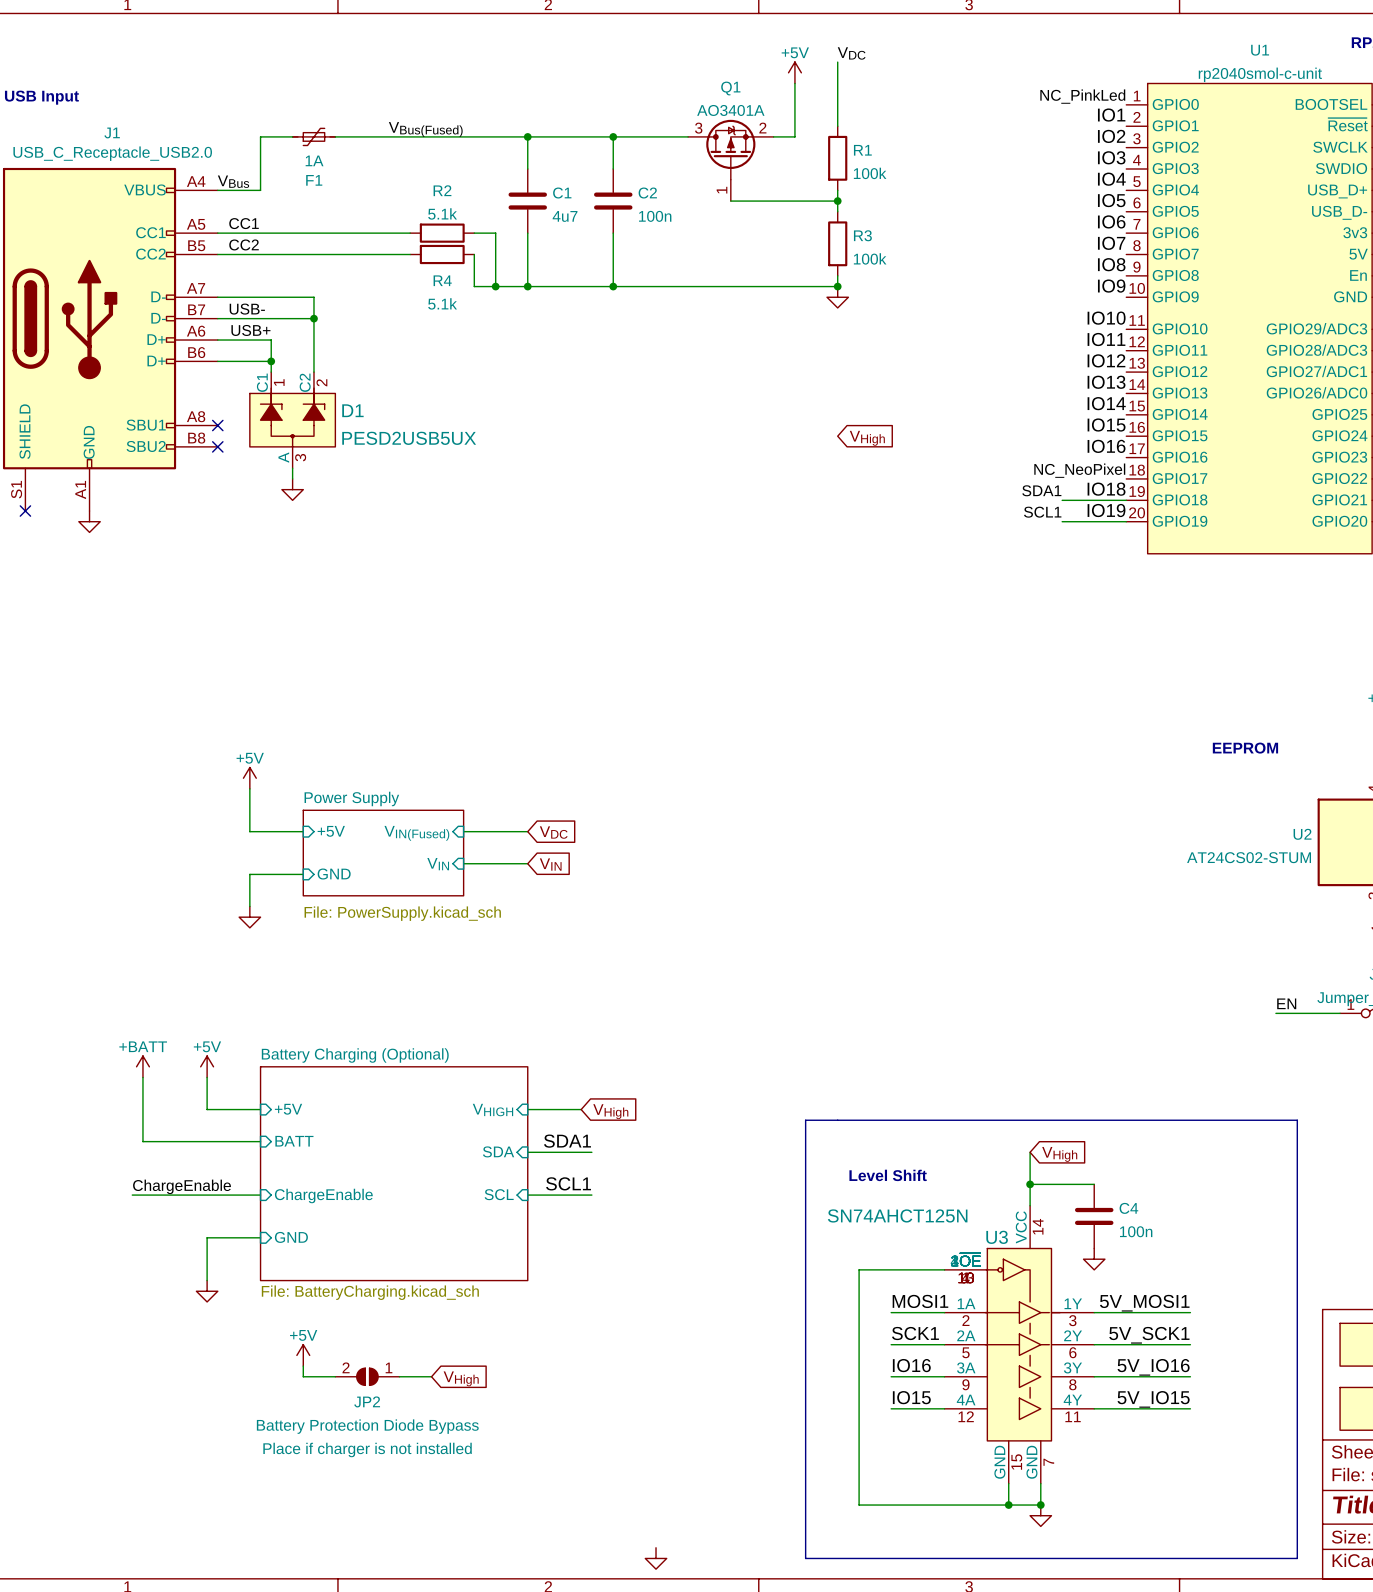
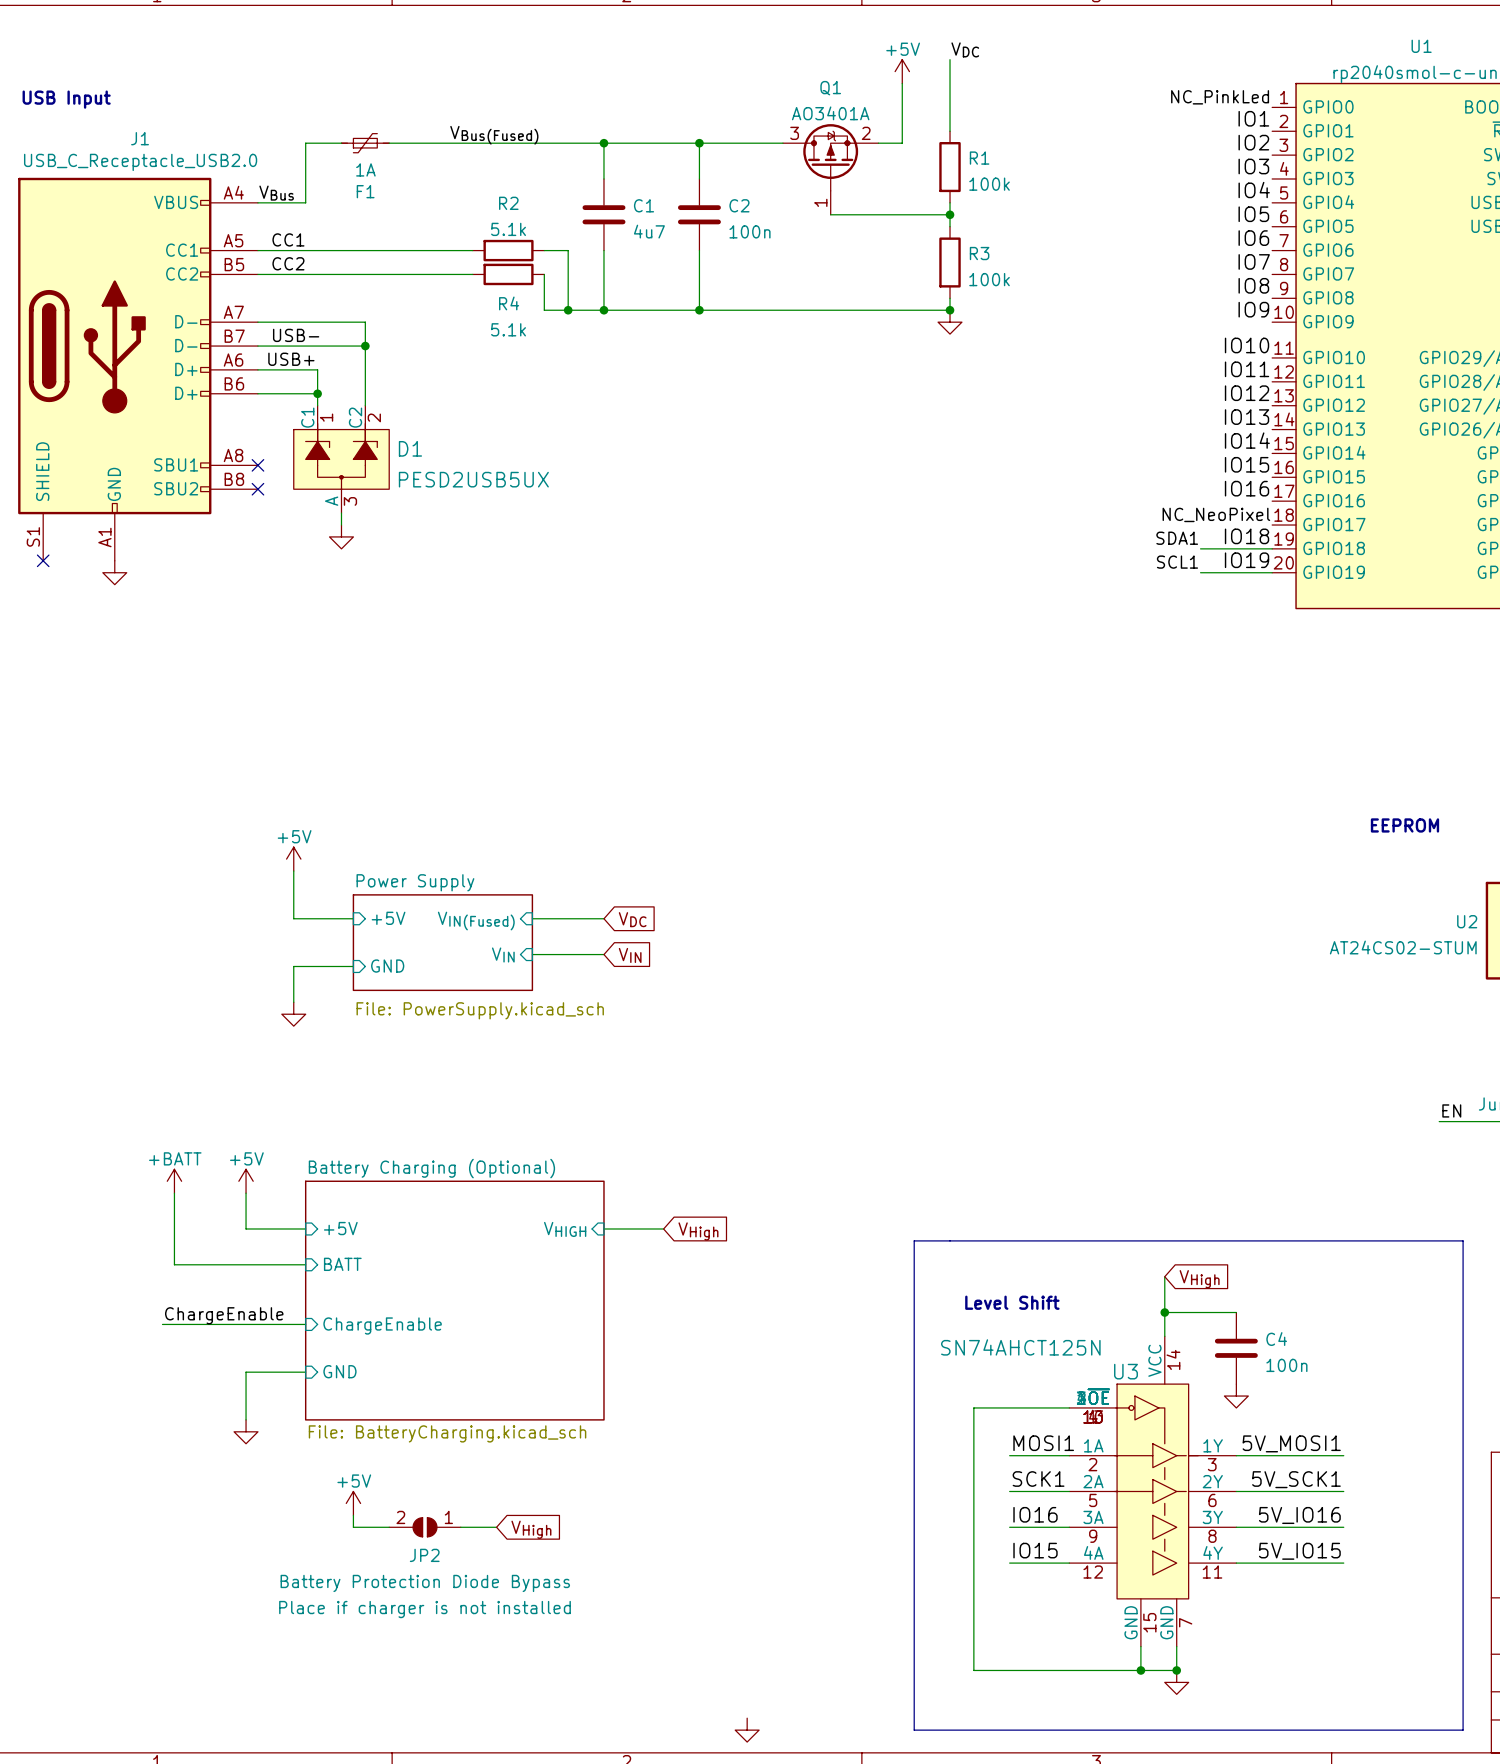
global label: VHigh (867, 438) -> none
label: SDA1 (567, 1141) -> none
sheet pin: SDA (498, 1151) -> none
wire: (527, 1152) (591, 1152) -> none
label: SCL1 (568, 1183) -> none
sheet pin: SCL (499, 1194) -> none
wire: (527, 1195) (591, 1195) -> none

